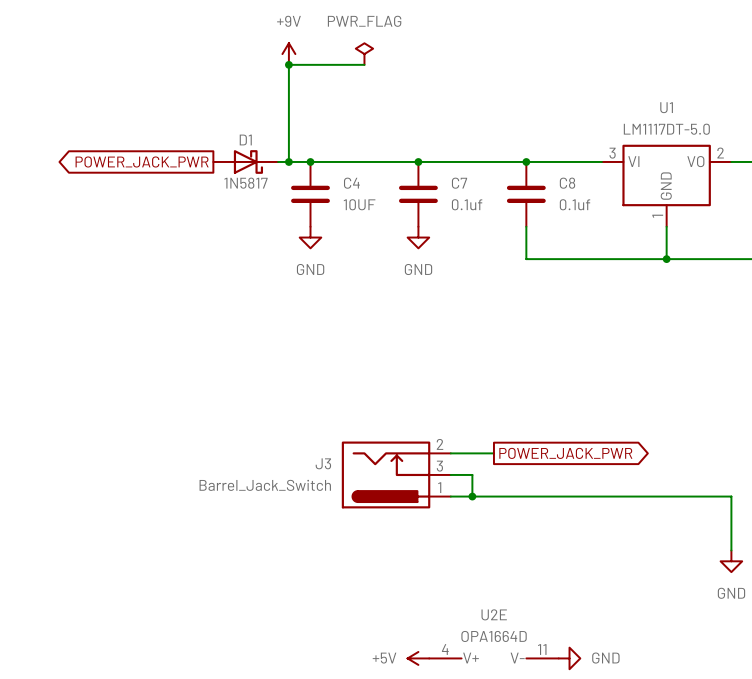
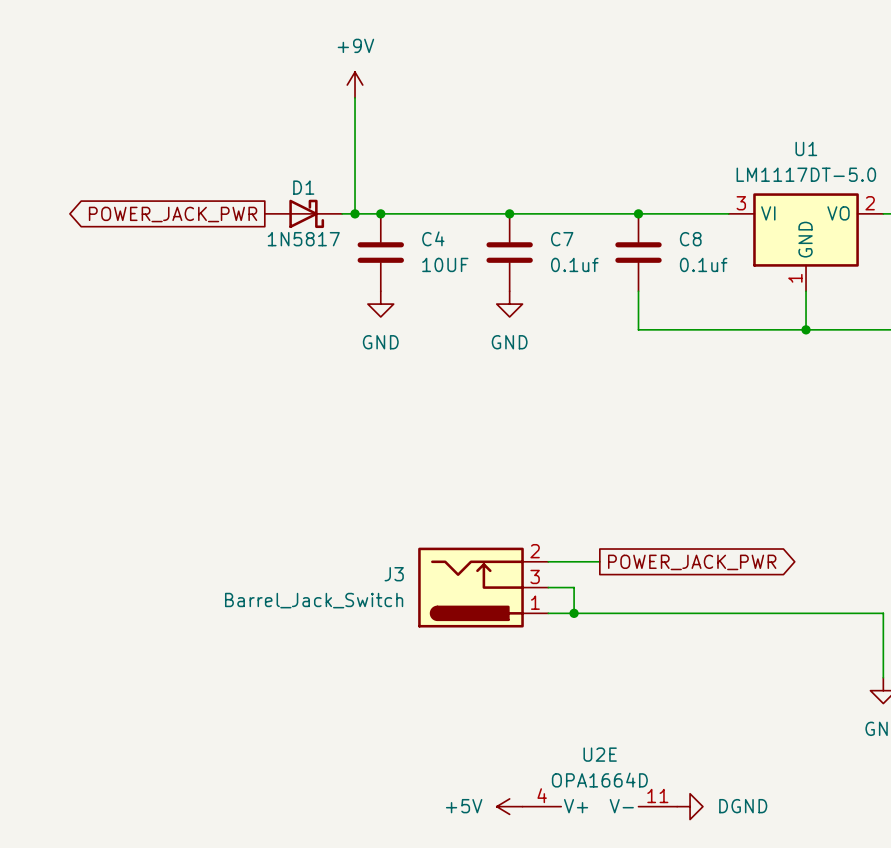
power symbol: PWR_FLAG (364, 54) -> none
wire: (288, 64) (364, 64) -> none
junction: (288, 64) -> none
power symbol: GND (569, 658) -> DGND (690, 806)

